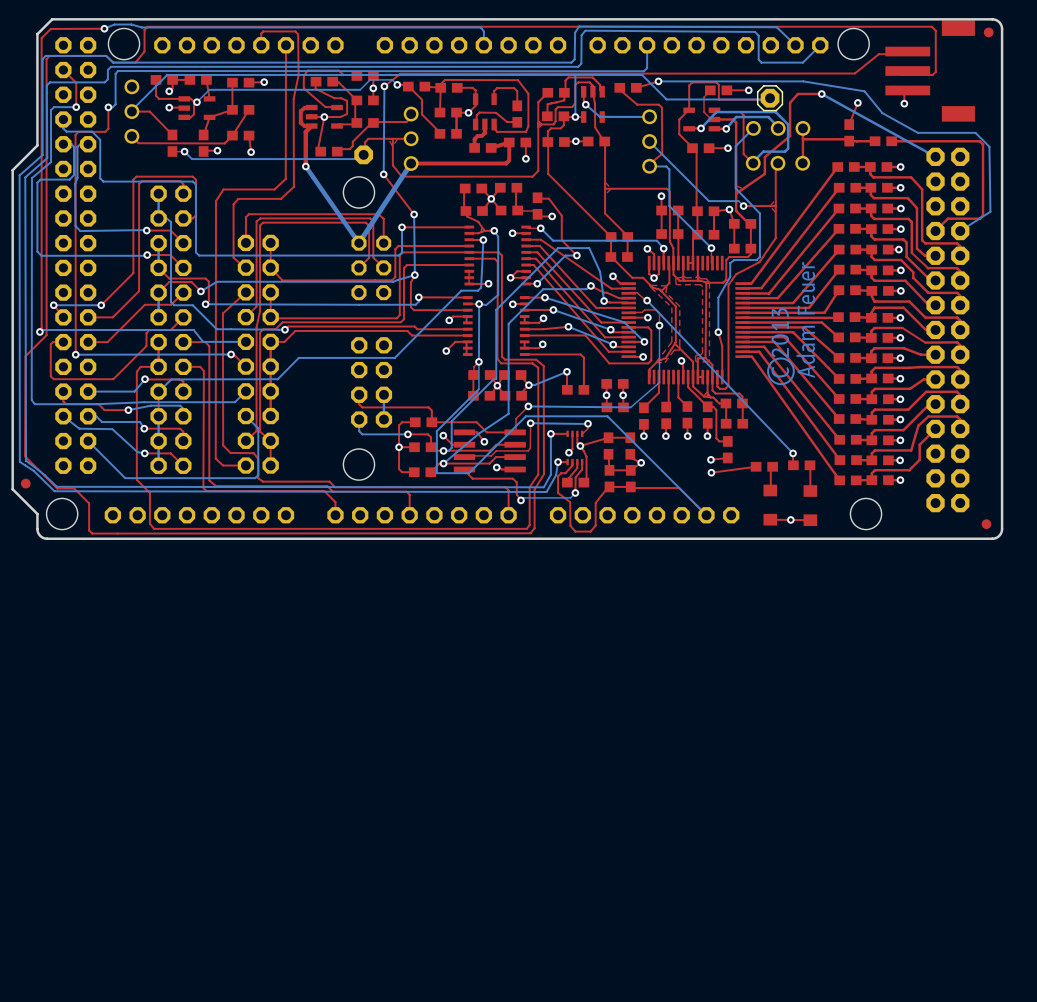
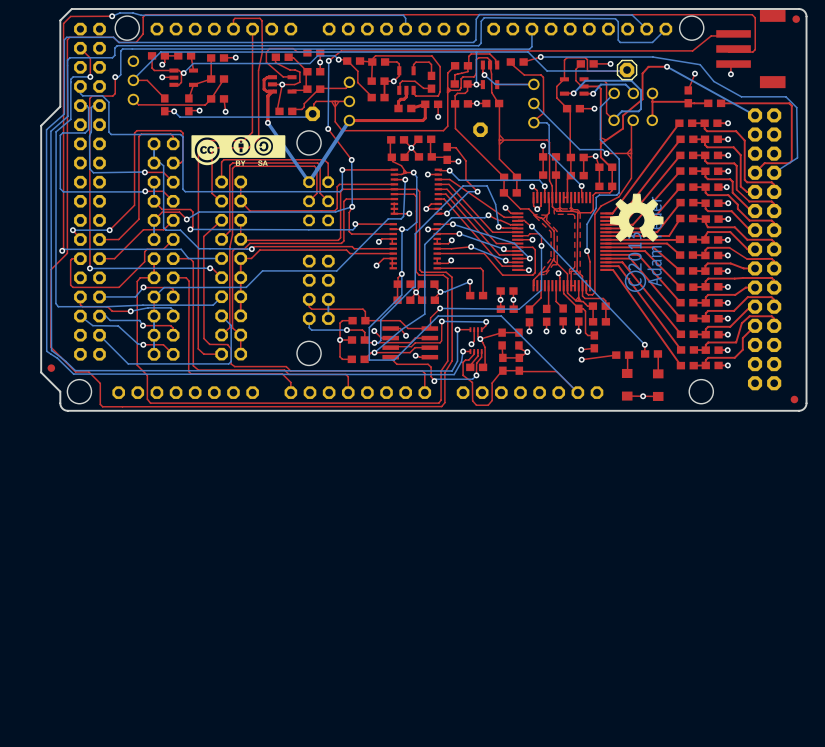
part: none -> (480, 129)
drawing: none -> [191, 135, 286, 166]
drawing: none -> [610, 193, 664, 242]

